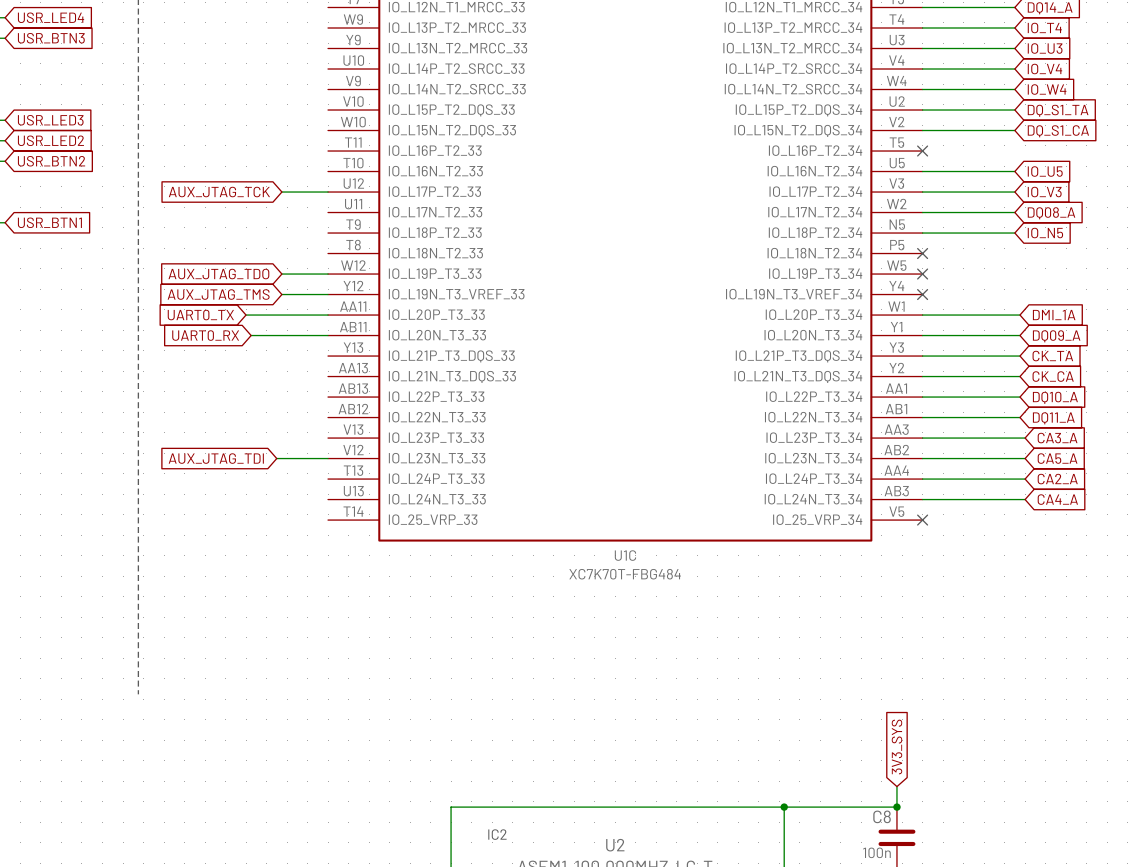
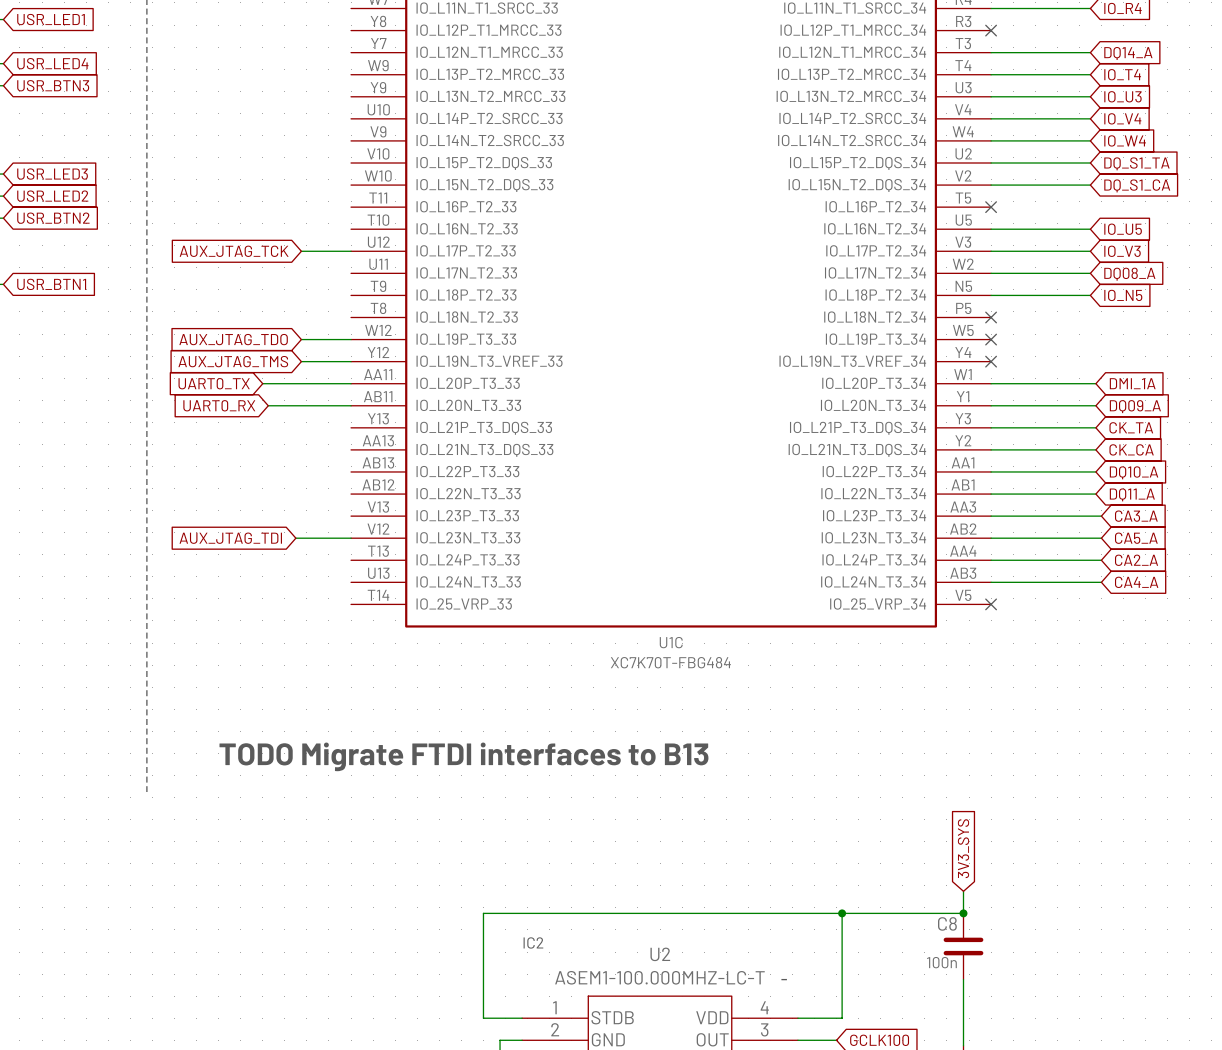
text: none -> TODO Migrate FTDI interfaces to B13 (463, 756)

